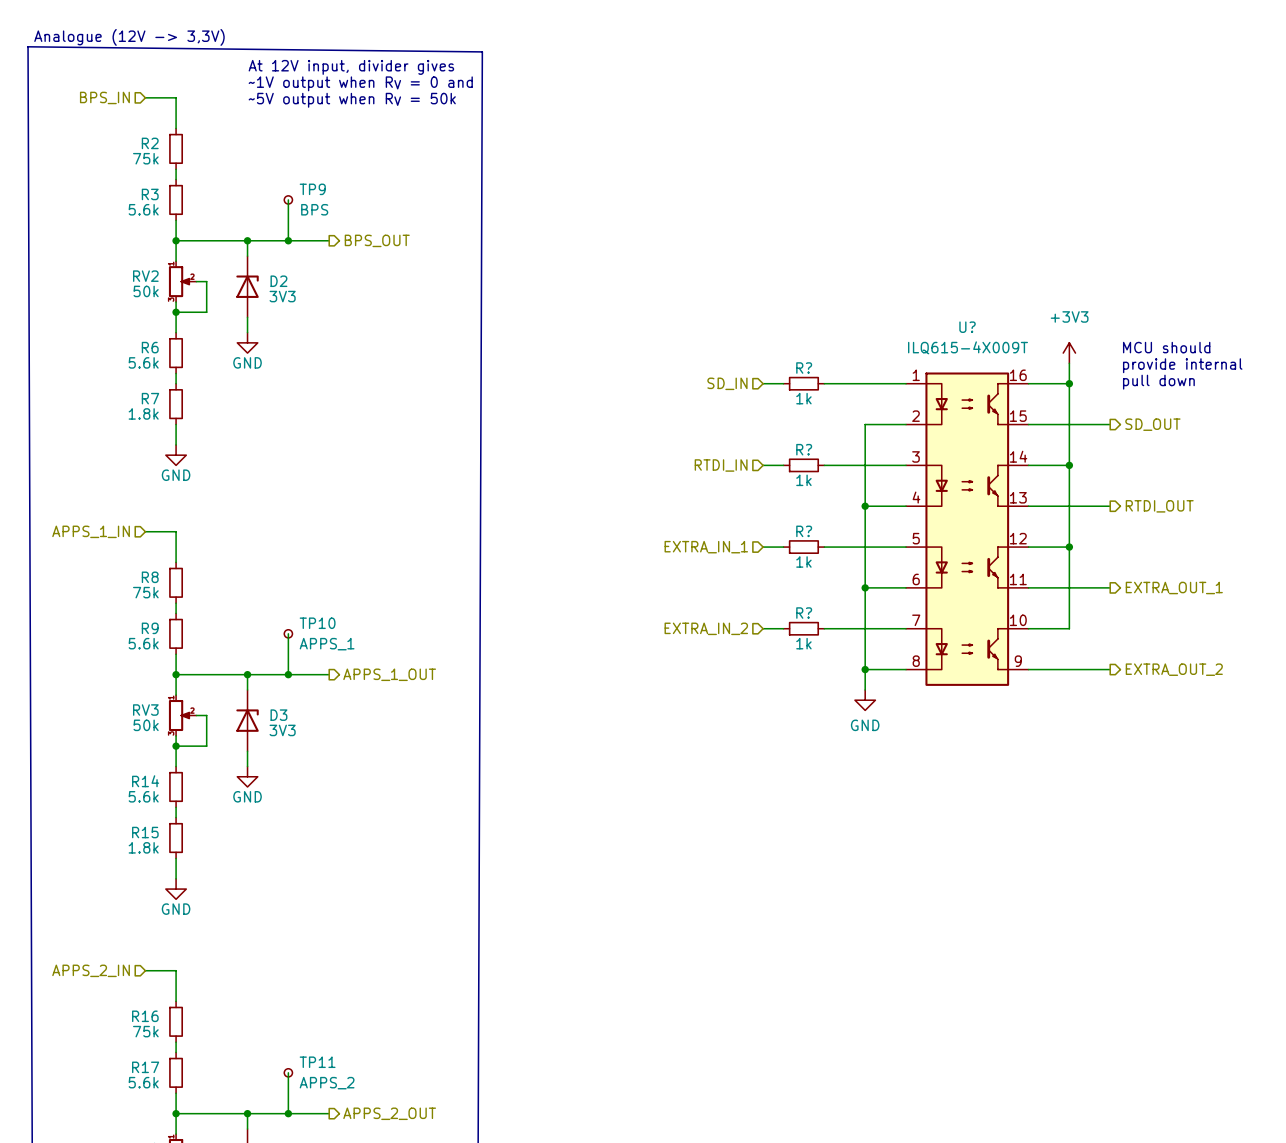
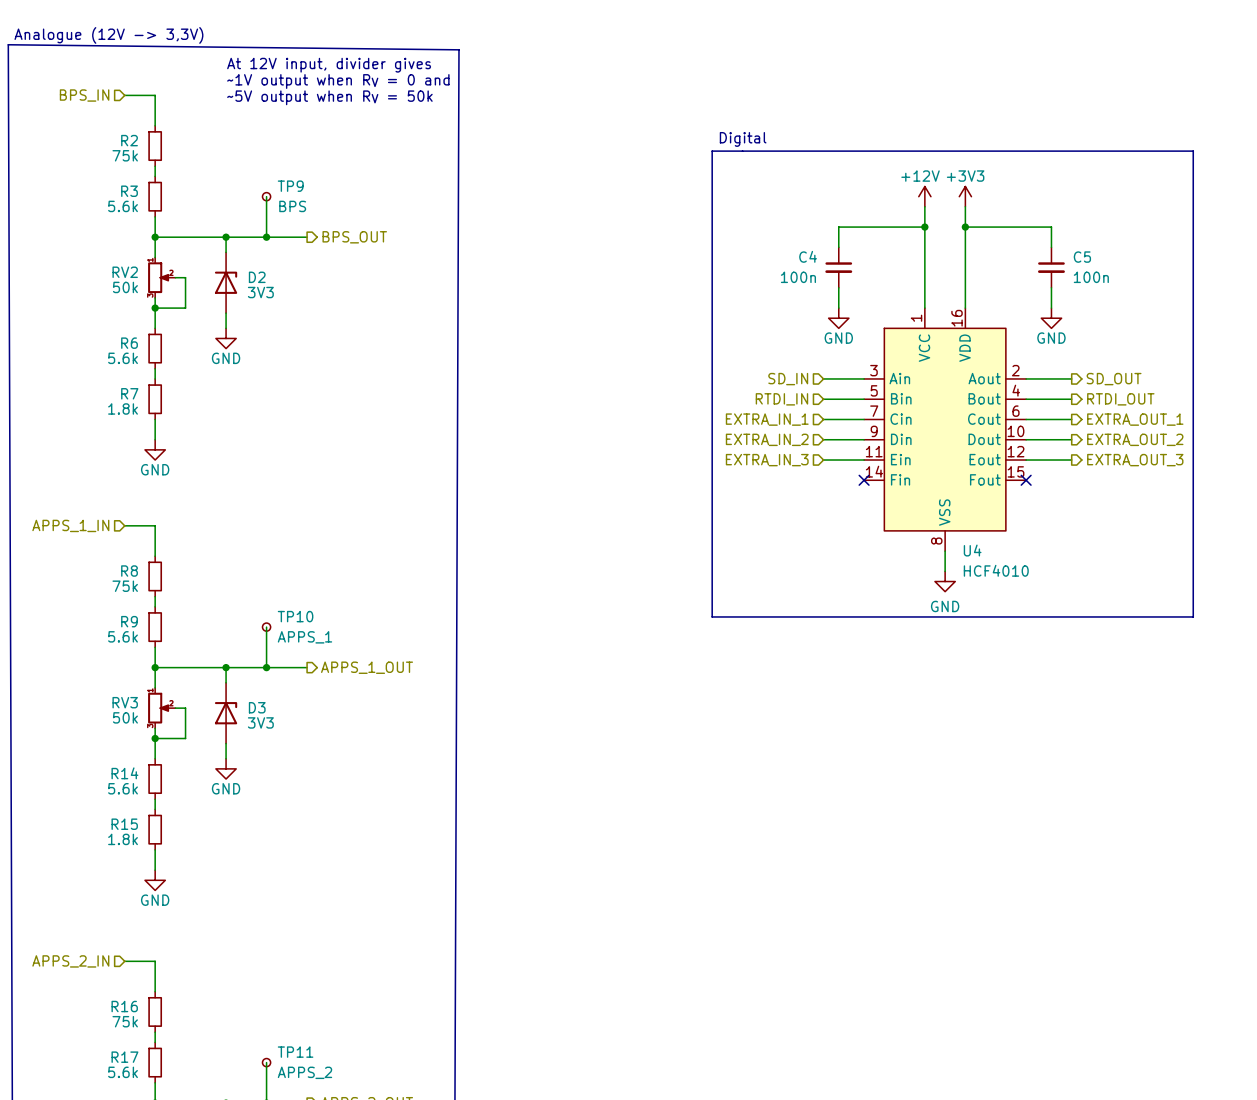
text: none -> Digital (743, 139)
line: none -> (712, 151) (712, 616) (1193, 616) (1193, 151) (712, 151)
power symbol: none -> +12V (924, 196)
wire: none -> (924, 206) (924, 308)
wire: none -> (965, 206) (965, 308)
wire: none -> (924, 227) (838, 227) (838, 247)
junction: none -> (924, 227)
wire: none -> (965, 227) (1051, 227) (1051, 247)
junction: none -> (965, 227)
C4: none -> 100n (838, 267)
C5: none -> 100n (1051, 267)
wire: none -> (838, 287) (838, 308)
wire: none -> (1051, 287) (1051, 308)
power symbol text position: +3V3 (1069, 316) -> +3V3 (965, 176)
power symbol: none -> GND (838, 318)
power symbol: none -> GND (1051, 318)
text: MCU should (1166, 347) -> none
power symbol position: +3V3 (1069, 353) -> +3V3 (965, 196)
wire: (1069, 363) (1069, 628) (1028, 628) -> none
text: provide internal (1182, 365) -> none
text: pull down (1158, 382) -> none
hierarchical label position: SD_IN (727, 383) -> SD_IN (788, 379)
wire: (763, 383) (783, 383) -> none
R?: 1k (803, 383) -> none
wire: (824, 383) (849, 383) -> none
wire: none -> (1041, 378) (1071, 378)
junction: (1069, 383) -> none
wire: none -> (1026, 399) (1071, 399)
wire: (865, 424) (865, 689) -> (838, 419) (823, 419)
wire: (1099, 424) (1110, 424) -> none
hierarchical label position: SD_OUT (1152, 424) -> SD_OUT (1114, 379)
U4: none -> HCF4010 (945, 429)
wire: none -> (1026, 439) (1071, 439)
hierarchical label: none -> EXTRA_IN_2 (767, 439)
hierarchical label: none -> EXTRA_OUT_2 (1135, 439)
hierarchical label position: RTDI_IN (721, 465) -> RTDI_IN (781, 399)
wire: (763, 465) (783, 465) -> none
hierarchical label: none -> EXTRA_IN_3 (767, 460)
R?: 1k (803, 465) -> none
wire: (824, 465) (849, 465) -> none
wire: none -> (1041, 460) (1071, 460)
junction: (1069, 465) -> none
hierarchical label: none -> EXTRA_OUT_3 (1135, 460)
no-connect mark: none -> (864, 480)
no-connect mark: none -> (1026, 480)
wire: (865, 506) (906, 506) -> (823, 439) (864, 439)
junction: (865, 506) -> none
wire: (1028, 506) (1110, 506) -> none
hierarchical label position: RTDI_OUT (1159, 506) -> RTDI_OUT (1120, 399)
U?: ILQ615-4X009T (967, 529) -> none
hierarchical label position: EXTRA_IN_1 (706, 547) -> EXTRA_IN_1 (767, 419)
wire: (763, 547) (783, 547) -> none
R?: 1k (803, 547) -> none
wire: (824, 547) (906, 547) -> none
wire: (1028, 547) (1069, 547) -> none
junction: (1069, 547) -> none
wire: (865, 587) (906, 587) -> (823, 399) (864, 399)
junction: (865, 587) -> none
wire: (1028, 587) (1110, 587) -> none
hierarchical label position: EXTRA_OUT_1 (1174, 588) -> EXTRA_OUT_1 (1135, 419)
hierarchical label: EXTRA_IN_2 (706, 628) -> none
wire: (763, 628) (783, 628) -> none
R?: 1k (803, 628) -> none
wire: (824, 628) (906, 628) -> none
wire: (865, 669) (906, 669) -> none
junction: (865, 669) -> none
wire: (1028, 669) (1110, 669) -> none
hierarchical label: EXTRA_OUT_2 (1174, 669) -> none
power symbol position: GND (865, 700) -> GND (945, 581)

